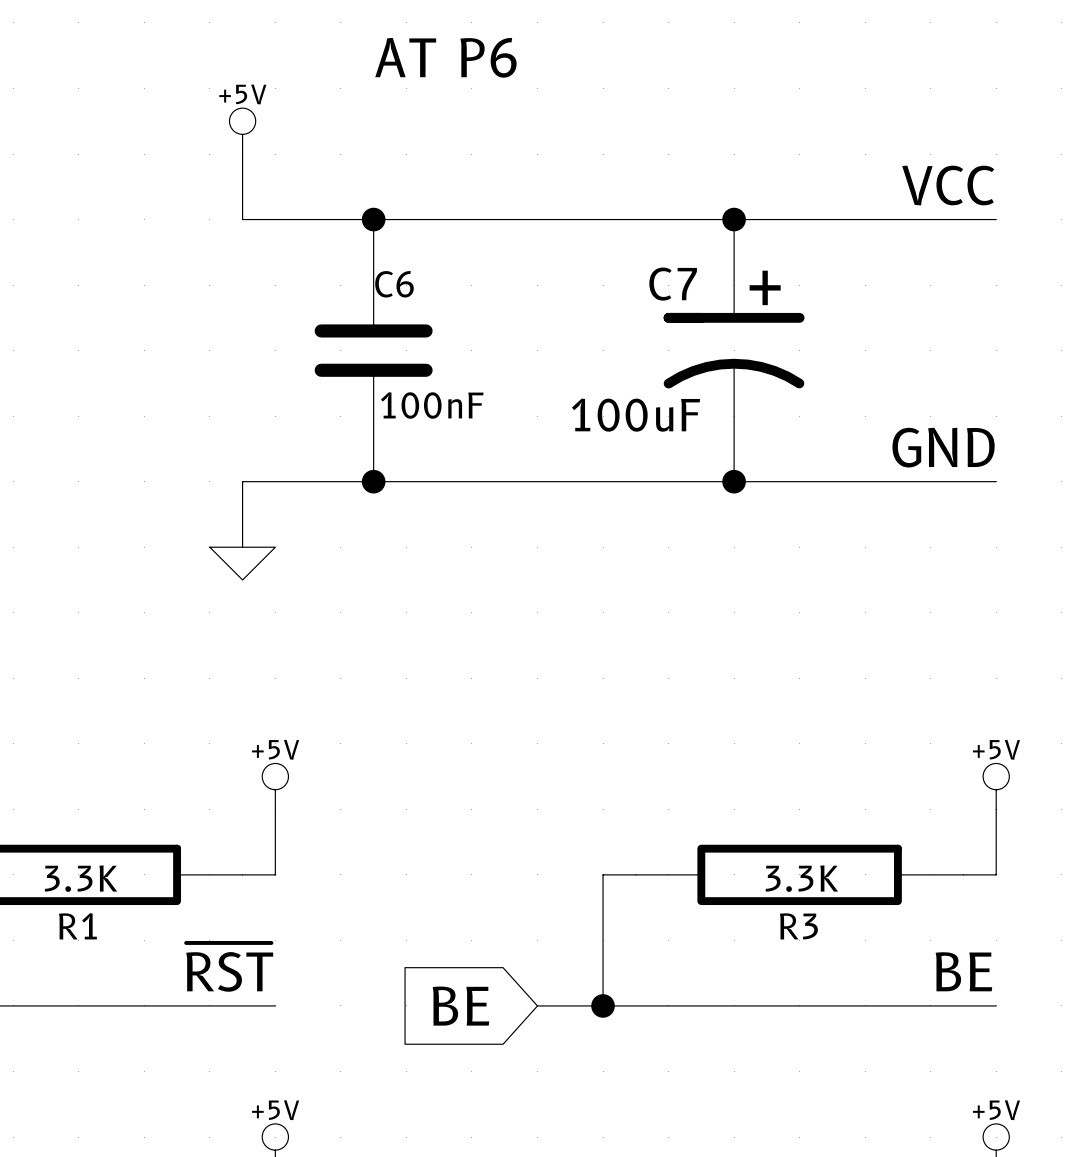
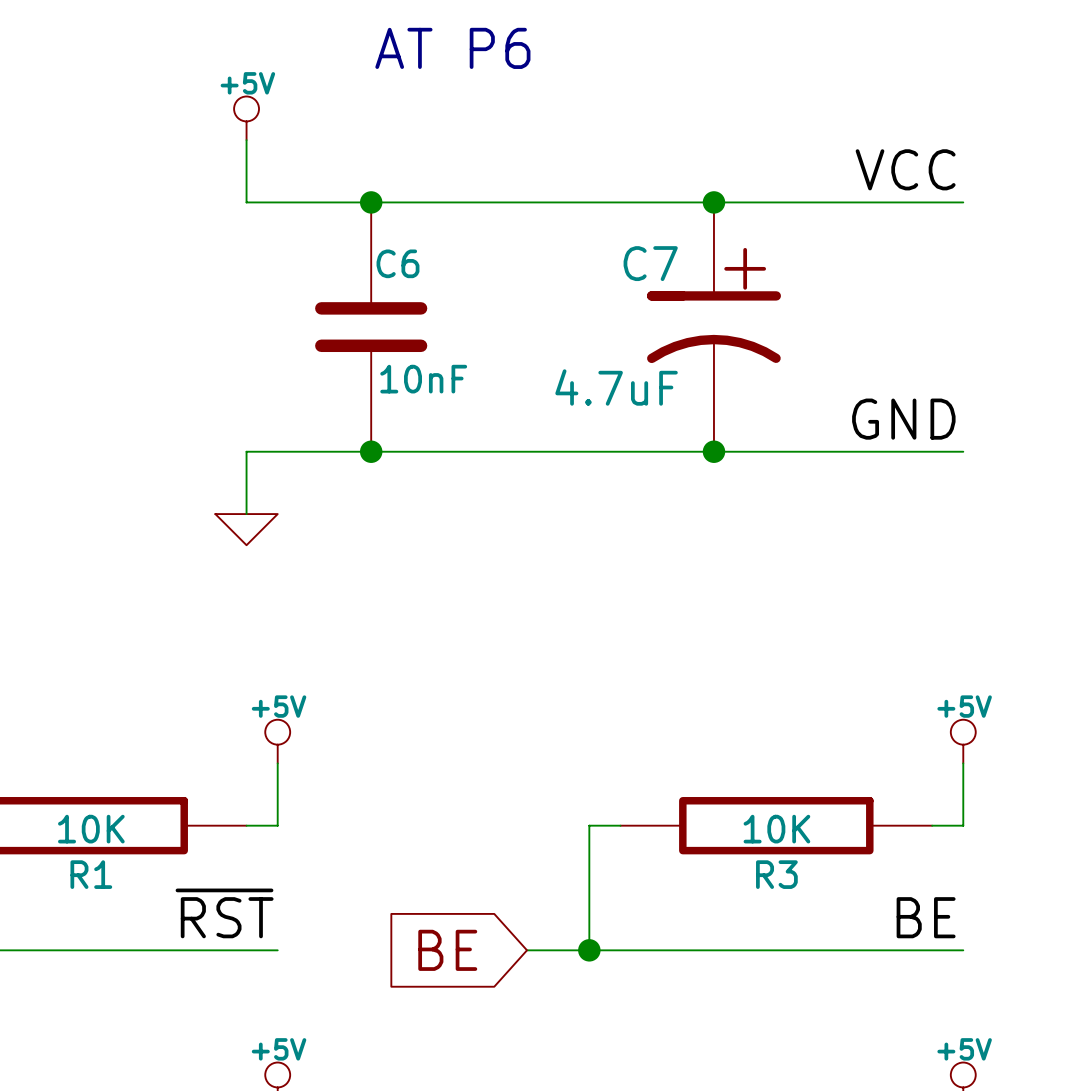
C6 value: 100nF (432, 405) -> 10nF (423, 379)
C7 value: 100uF (636, 415) -> 4.7uF (616, 387)
R1 value: 3.3K (81, 878) -> 10K (91, 829)
R3 value: 3.3K (801, 878) -> 10K (776, 829)

